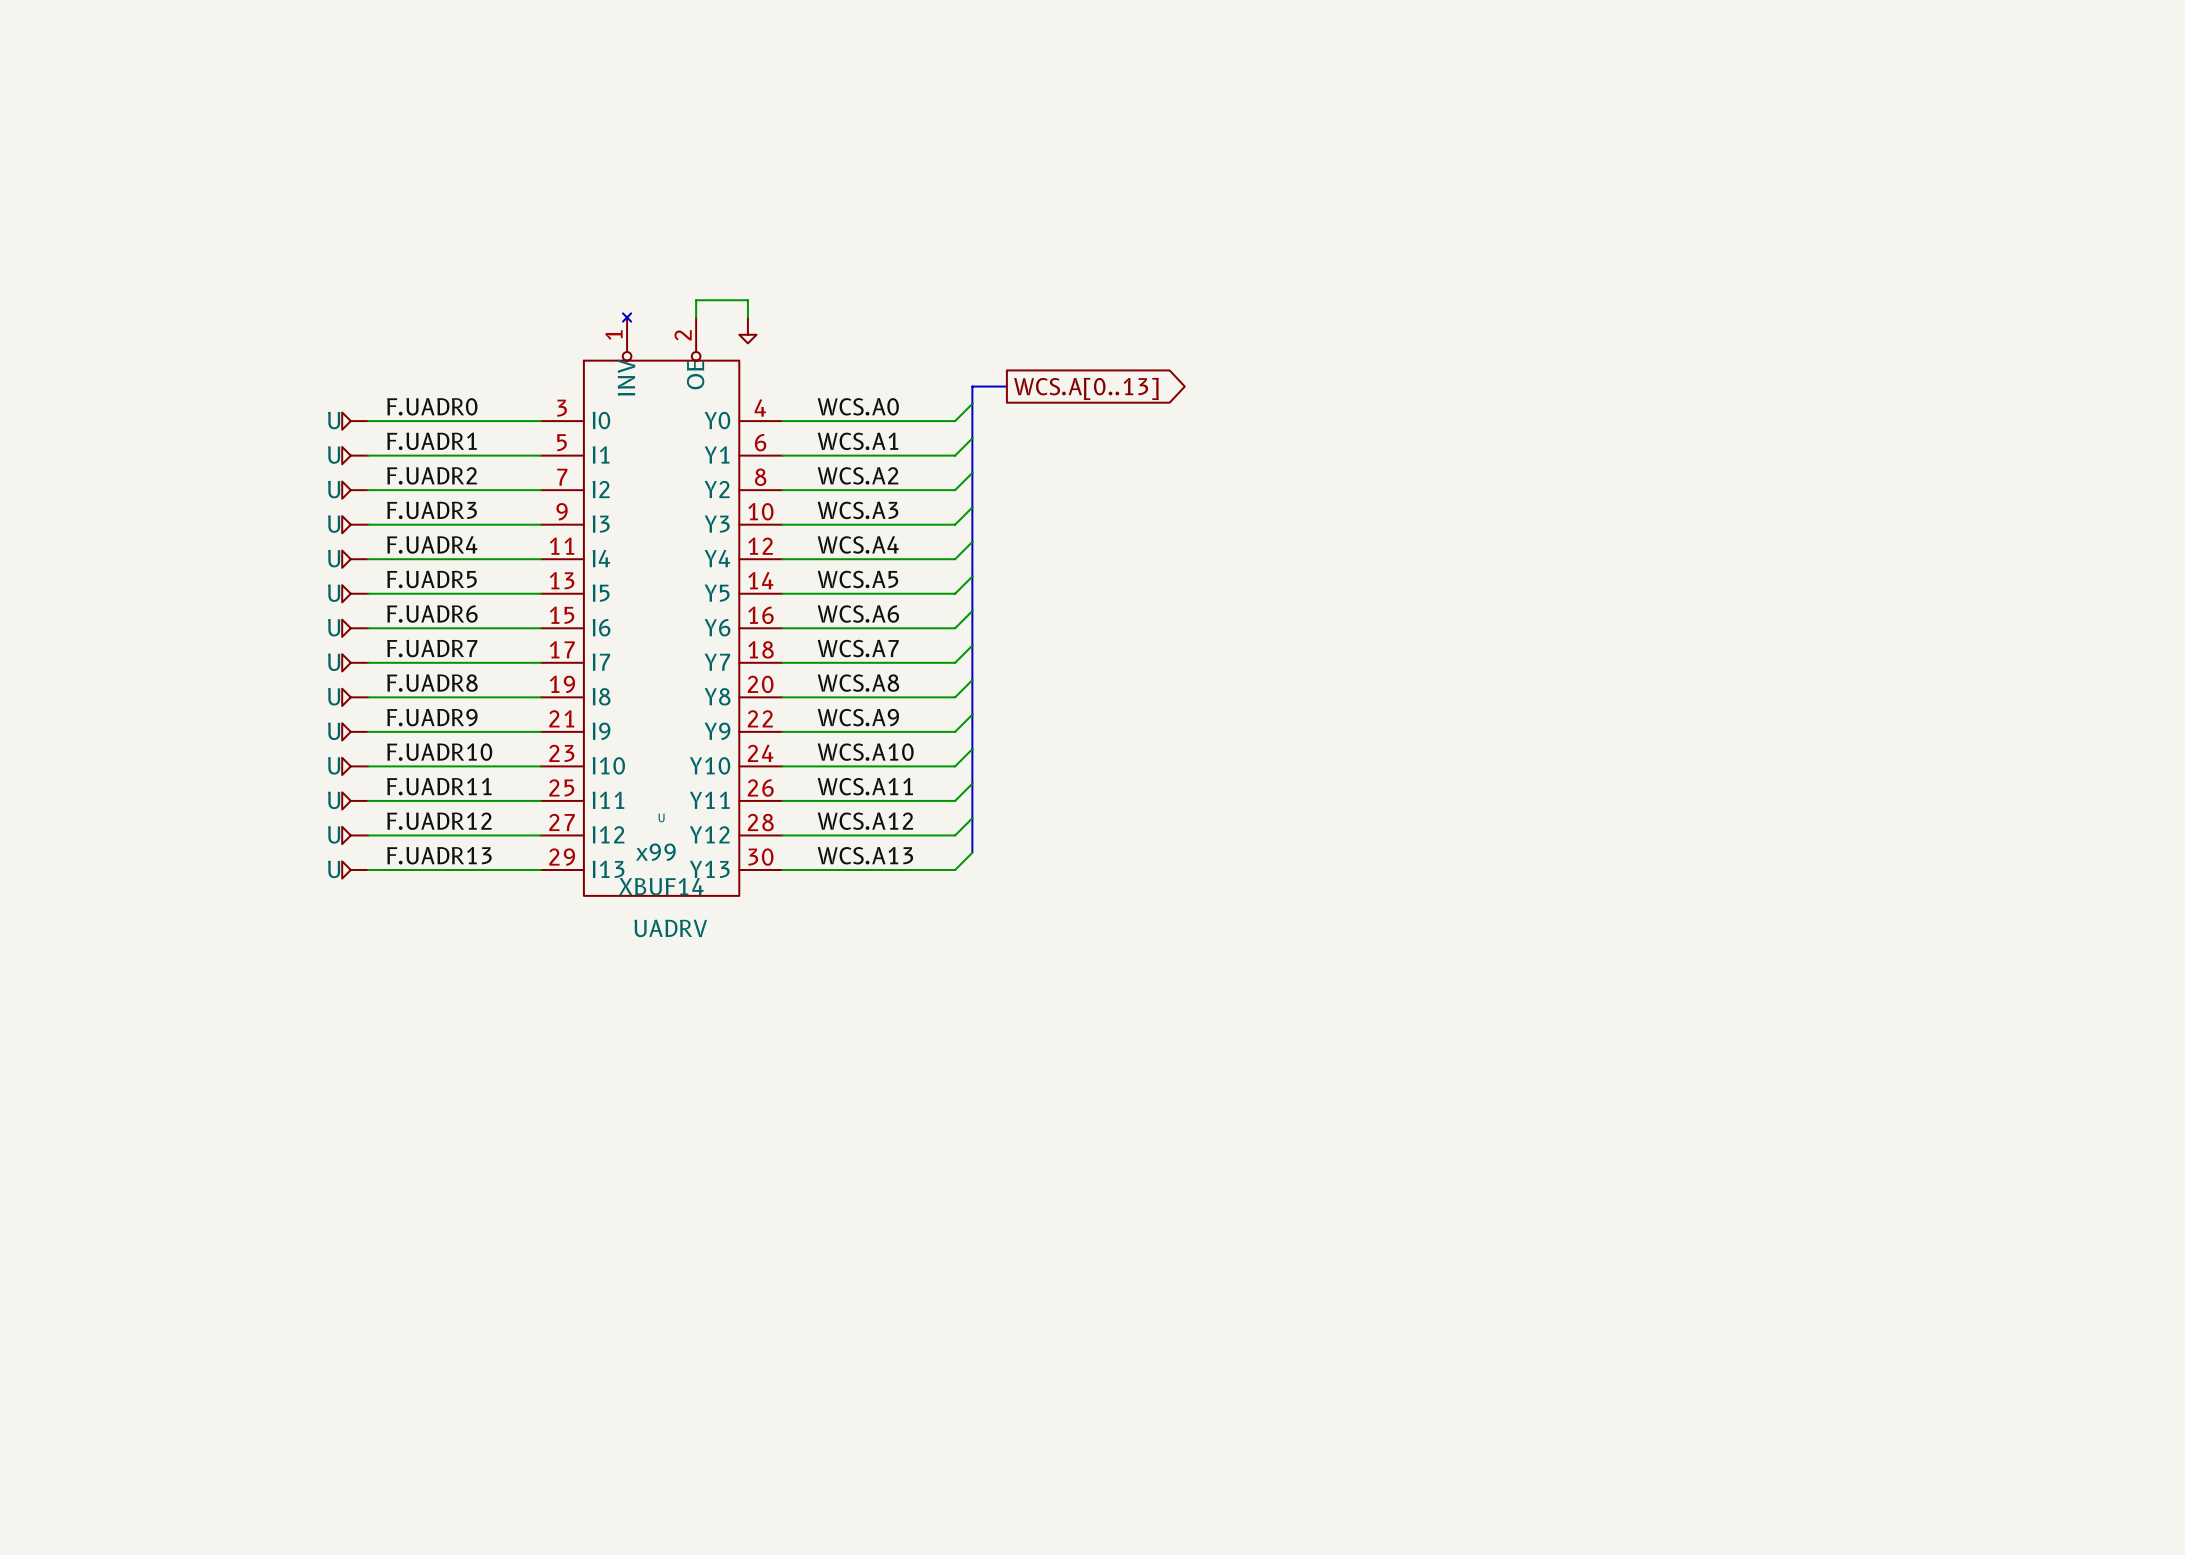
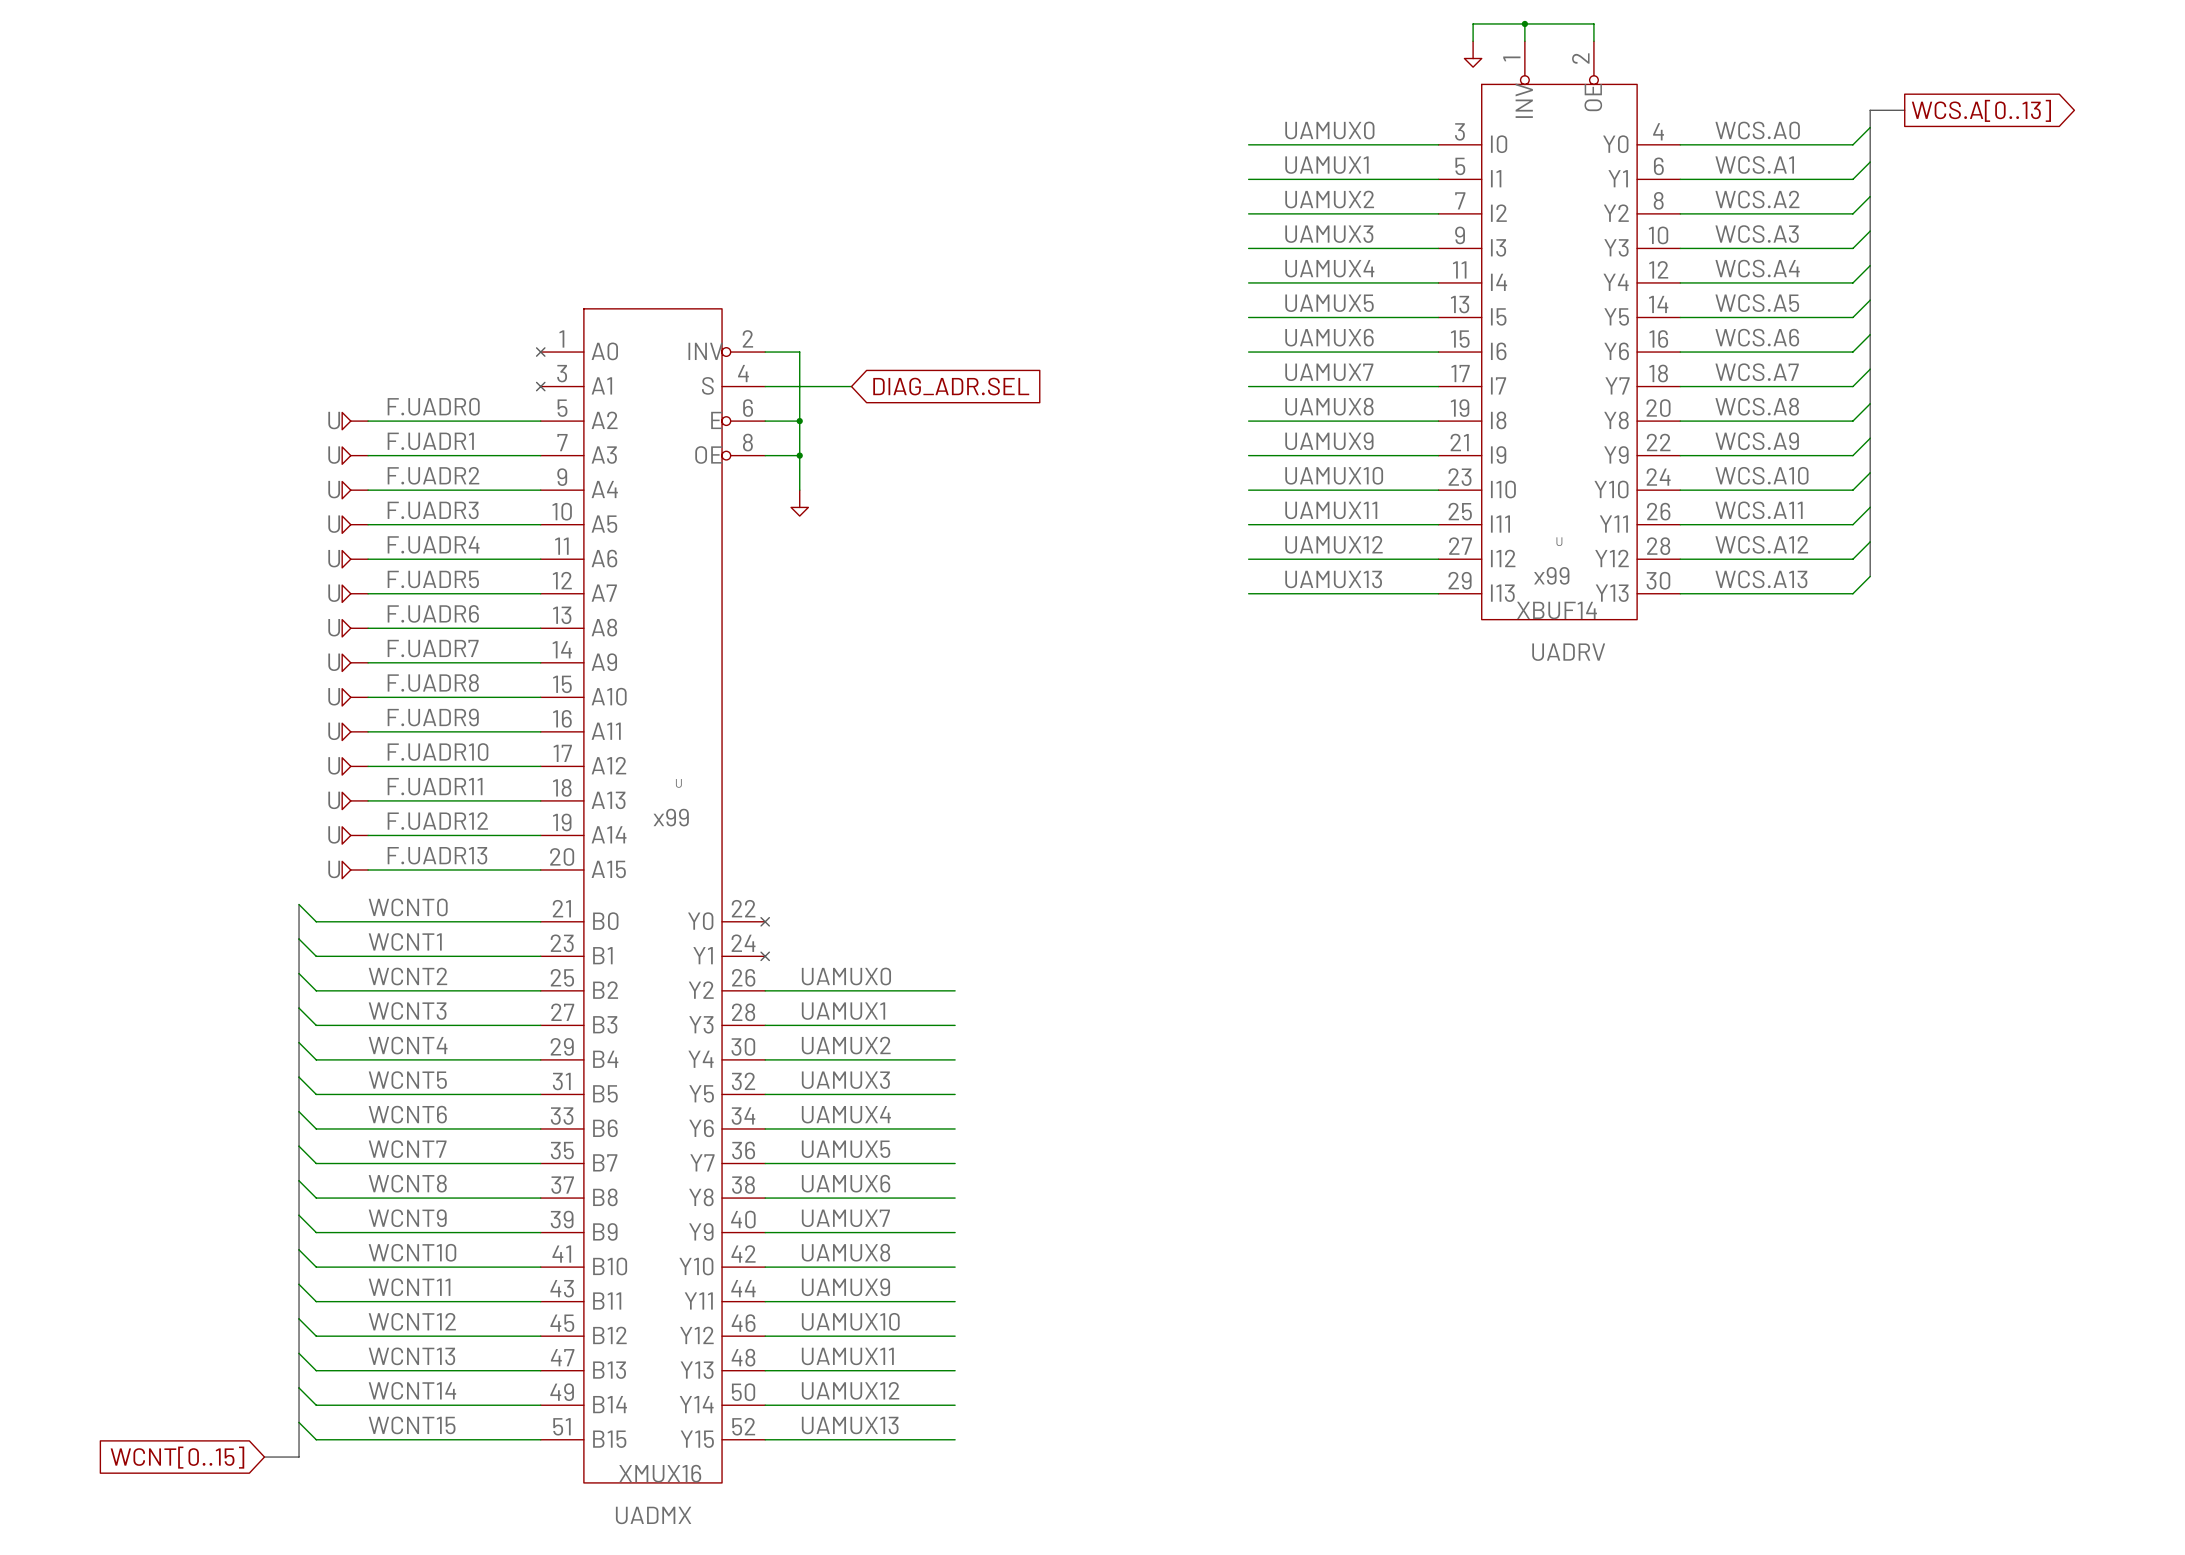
wire: none -> (1524, 23) (1524, 41)
junction: none -> (1524, 23)
wire: none -> (1473, 41) (1473, 23) (1593, 23) (1593, 41)
power symbol: none -> (1473, 54)
bus: none -> (1904, 110) (1870, 110) (1870, 576)
global label: none -> WCS.A[0..13] (1981, 110)
wire: none -> (1870, 127) (1852, 144) (1680, 144)
label: none -> UAMUX0 (1329, 130)
label: none -> WCS.A0 (1757, 130)
wire: none -> (1248, 144) (1438, 144)
wire: none -> (1870, 162) (1852, 179) (1680, 179)
label: none -> UAMUX1 (1326, 165)
label: none -> WCS.A1 (1754, 165)
wire: none -> (1248, 179) (1438, 179)
wire: none -> (1870, 196) (1852, 213) (1680, 213)
label: none -> UAMUX2 (1329, 199)
label: none -> WCS.A2 (1757, 199)
wire: none -> (1248, 213) (1438, 213)
wire: none -> (1870, 231) (1852, 248) (1680, 248)
label: none -> UAMUX3 (1329, 234)
label: none -> WCS.A3 (1757, 234)
wire: none -> (1248, 248) (1438, 248)
wire: none -> (1870, 265) (1852, 282) (1680, 282)
label: none -> UAMUX4 (1329, 268)
label: none -> WCS.A4 (1757, 268)
wire: none -> (1248, 282) (1438, 282)
wire: none -> (1870, 300) (1852, 317) (1680, 317)
label: none -> UAMUX5 (1329, 303)
label: none -> WCS.A5 (1757, 303)
no-connect mark: (627, 317) -> none
wire: (696, 317) (696, 300) (747, 300) (747, 317) -> none
wire: none -> (1248, 317) (1438, 317)
power symbol: (747, 330) -> none
U: none -> XBUF14 (1559, 330)
wire: none -> (1870, 334) (1852, 352) (1680, 352)
label: none -> UAMUX6 (1329, 337)
label: none -> WCS.A6 (1757, 337)
no-connect mark: none -> (540, 352)
wire: none -> (765, 352) (799, 352) (799, 490)
wire: none -> (1248, 352) (1438, 352)
wire: none -> (1870, 369) (1852, 386) (1680, 386)
label: none -> UAMUX7 (1329, 372)
label: none -> WCS.A7 (1757, 372)
no-connect mark: none -> (540, 386)
wire: none -> (765, 386) (851, 386)
bus: (1006, 386) (972, 386) (972, 852) -> none
wire: none -> (1248, 386) (1438, 386)
global label: WCS.A[0..13] (1086, 388) -> none
global label: none -> DIAG_ADR.SEL (951, 386)
wire: (972, 403) (955, 421) (799, 421) -> none
wire: none -> (1870, 403) (1852, 421) (1680, 421)
label: WCS.A0 (858, 406) -> none
label: none -> UAMUX8 (1329, 406)
label: none -> WCS.A8 (1757, 406)
junction: none -> (799, 421)
wire: none -> (1248, 421) (1438, 421)
wire: (972, 438) (955, 455) (799, 455) -> none
wire: none -> (1870, 438) (1852, 455) (1680, 455)
label: WCS.A1 (857, 441) -> none
label: none -> UAMUX9 (1329, 441)
label: none -> WCS.A9 (1757, 441)
junction: none -> (799, 455)
wire: none -> (1248, 455) (1438, 455)
wire: (972, 472) (955, 490) (782, 490) -> none
wire: none -> (1870, 472) (1852, 490) (1680, 490)
label: WCS.A2 (858, 475) -> none
label: none -> UAMUX10 (1334, 475)
label: none -> WCS.A10 (1761, 475)
wire: none -> (1248, 490) (1438, 490)
power symbol: none -> (799, 503)
wire: (972, 507) (955, 524) (782, 524) -> none
wire: none -> (1870, 507) (1852, 524) (1680, 524)
label: WCS.A3 (858, 510) -> none
label: none -> UAMUX11 (1331, 510)
label: none -> WCS.A11 (1759, 510)
wire: none -> (1248, 524) (1438, 524)
wire: (972, 541) (955, 559) (782, 559) -> none
wire: none -> (1870, 541) (1852, 559) (1680, 559)
label: WCS.A4 (858, 544) -> none
label: none -> UAMUX12 (1333, 544)
label: none -> WCS.A12 (1761, 544)
wire: none -> (1248, 559) (1438, 559)
wire: (972, 576) (955, 593) (782, 593) -> none
wire: none -> (1870, 576) (1852, 593) (1680, 593)
label: WCS.A5 (857, 579) -> none
label: none -> UAMUX13 (1333, 579)
label: none -> WCS.A13 (1761, 579)
wire: none -> (1248, 593) (1438, 593)
U: XBUF14 (661, 606) -> none
wire: (972, 611) (955, 628) (782, 628) -> none
label: WCS.A6 (858, 614) -> none
wire: (972, 645) (955, 662) (782, 662) -> none
label: WCS.A7 (858, 648) -> none
wire: (972, 680) (955, 697) (782, 697) -> none
label: WCS.A8 (858, 683) -> none
wire: (972, 714) (955, 731) (782, 731) -> none
label: WCS.A9 (858, 717) -> none
wire: (972, 749) (955, 766) (782, 766) -> none
label: WCS.A10 (865, 752) -> none
wire: (972, 783) (955, 800) (782, 800) -> none
label: WCS.A11 (865, 786) -> none
wire: (972, 818) (955, 835) (782, 835) -> none
label: WCS.A12 (865, 821) -> none
wire: (972, 852) (955, 870) (782, 870) -> none
label: WCS.A13 (865, 855) -> none
U: none -> XMUX16 (652, 895)
wire: none -> (299, 904) (316, 921) (540, 921)
bus: none -> (299, 904) (299, 1457) (264, 1457)
label: none -> WCNT0 (408, 907)
no-connect mark: none -> (765, 921)
wire: none -> (299, 939) (316, 956) (540, 956)
label: none -> WCNT1 (405, 941)
no-connect mark: none -> (765, 956)
wire: none -> (299, 973) (316, 990) (540, 990)
label: none -> WCNT2 (407, 976)
label: none -> UAMUX0 (846, 976)
wire: none -> (765, 990) (955, 990)
wire: none -> (299, 1008) (316, 1025) (540, 1025)
label: none -> WCNT3 (407, 1011)
label: none -> UAMUX1 (843, 1011)
wire: none -> (765, 1025) (955, 1025)
wire: none -> (299, 1042) (316, 1059) (540, 1059)
label: none -> WCNT4 (408, 1045)
label: none -> UAMUX2 (846, 1045)
wire: none -> (765, 1059) (955, 1059)
wire: none -> (299, 1077) (316, 1094) (540, 1094)
label: none -> WCNT5 (407, 1080)
label: none -> UAMUX3 (845, 1080)
wire: none -> (765, 1094) (955, 1094)
wire: none -> (299, 1111) (316, 1128) (540, 1128)
label: none -> WCNT6 (407, 1114)
label: none -> UAMUX4 (846, 1114)
wire: none -> (765, 1128) (955, 1128)
wire: none -> (299, 1146) (316, 1163) (540, 1163)
label: none -> WCNT7 (407, 1149)
label: none -> UAMUX5 (846, 1149)
wire: none -> (765, 1163) (955, 1163)
wire: none -> (299, 1180) (316, 1198) (540, 1198)
label: none -> WCNT8 (407, 1183)
label: none -> UAMUX6 (846, 1183)
wire: none -> (765, 1198) (955, 1198)
wire: none -> (299, 1215) (316, 1232) (540, 1232)
label: none -> WCNT9 (407, 1218)
label: none -> UAMUX7 (845, 1218)
wire: none -> (765, 1232) (955, 1232)
wire: none -> (299, 1249) (316, 1267) (540, 1267)
label: none -> WCNT10 (412, 1252)
label: none -> UAMUX8 (846, 1252)
wire: none -> (765, 1267) (955, 1267)
wire: none -> (299, 1284) (316, 1301) (540, 1301)
label: none -> WCNT11 (409, 1287)
label: none -> UAMUX9 (845, 1287)
wire: none -> (765, 1301) (955, 1301)
wire: none -> (299, 1318) (316, 1336) (540, 1336)
label: none -> WCNT12 (412, 1321)
label: none -> UAMUX10 (850, 1321)
wire: none -> (765, 1336) (955, 1336)
wire: none -> (299, 1353) (316, 1370) (540, 1370)
label: none -> WCNT13 (411, 1356)
label: none -> UAMUX11 (847, 1356)
wire: none -> (765, 1370) (955, 1370)
wire: none -> (299, 1387) (316, 1405) (540, 1405)
label: none -> WCNT14 (412, 1390)
label: none -> UAMUX12 (850, 1390)
wire: none -> (765, 1405) (955, 1405)
wire: none -> (299, 1422) (316, 1439) (540, 1439)
label: none -> WCNT15 (412, 1425)
label: none -> UAMUX13 (850, 1425)
wire: none -> (765, 1439) (955, 1439)
global label: none -> WCNT[0..15] (177, 1457)

